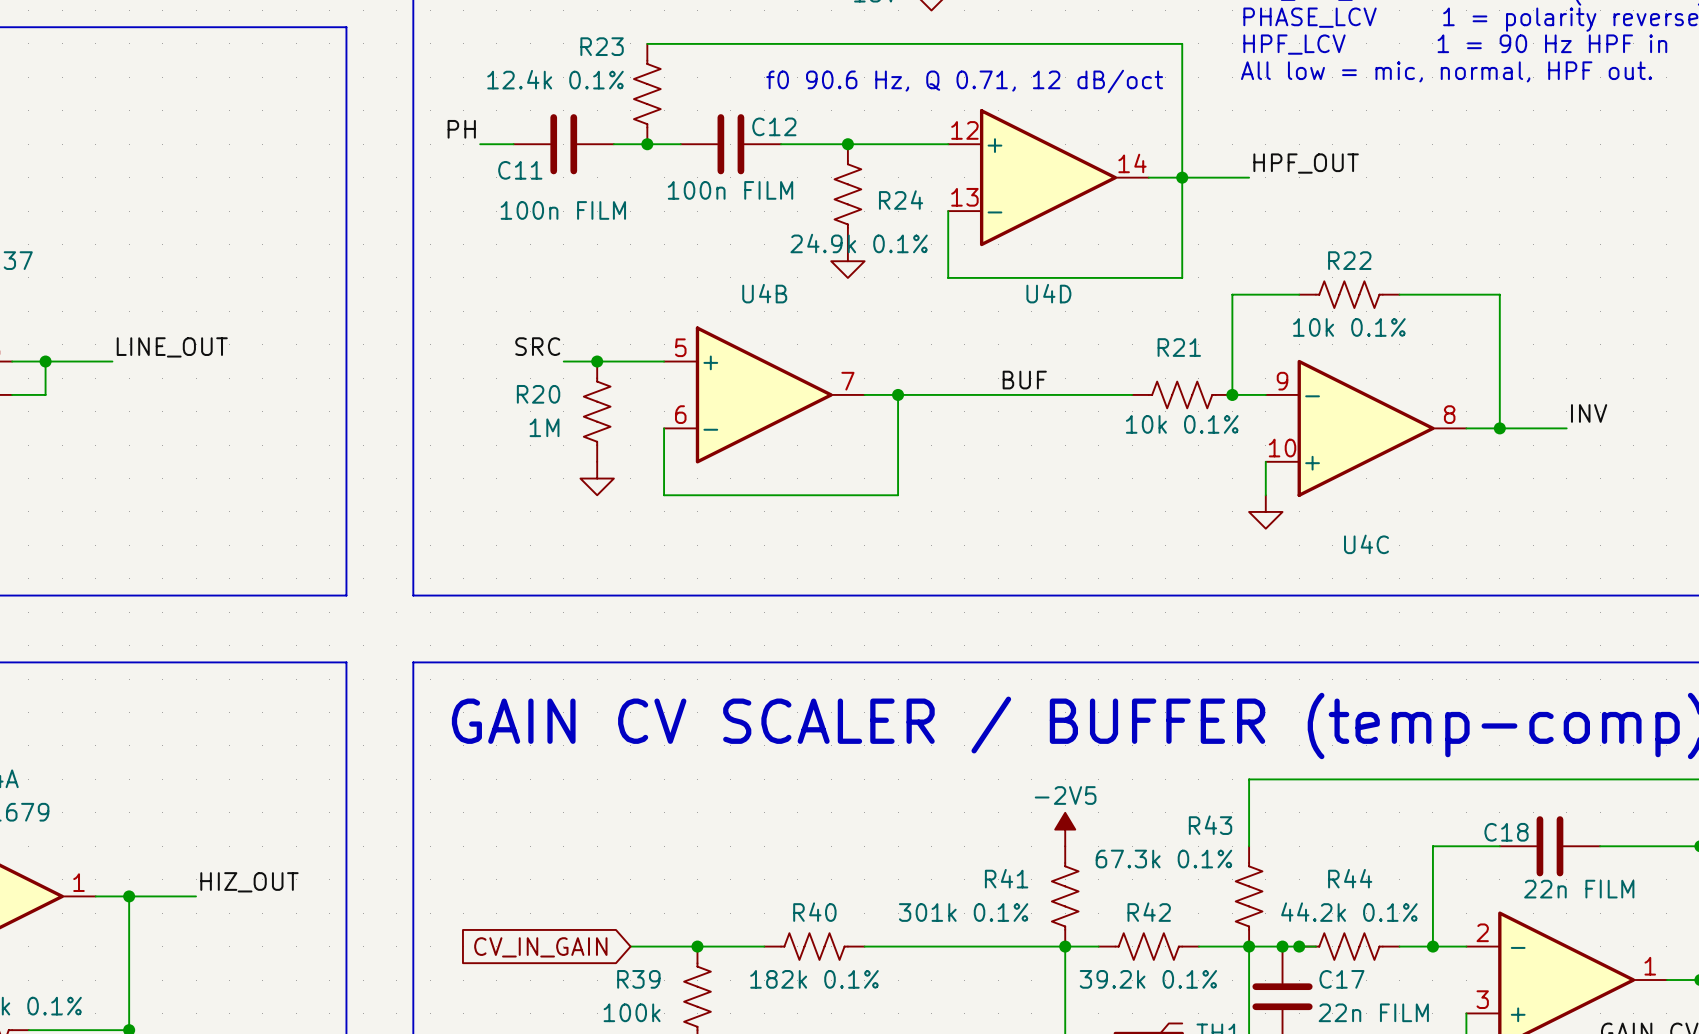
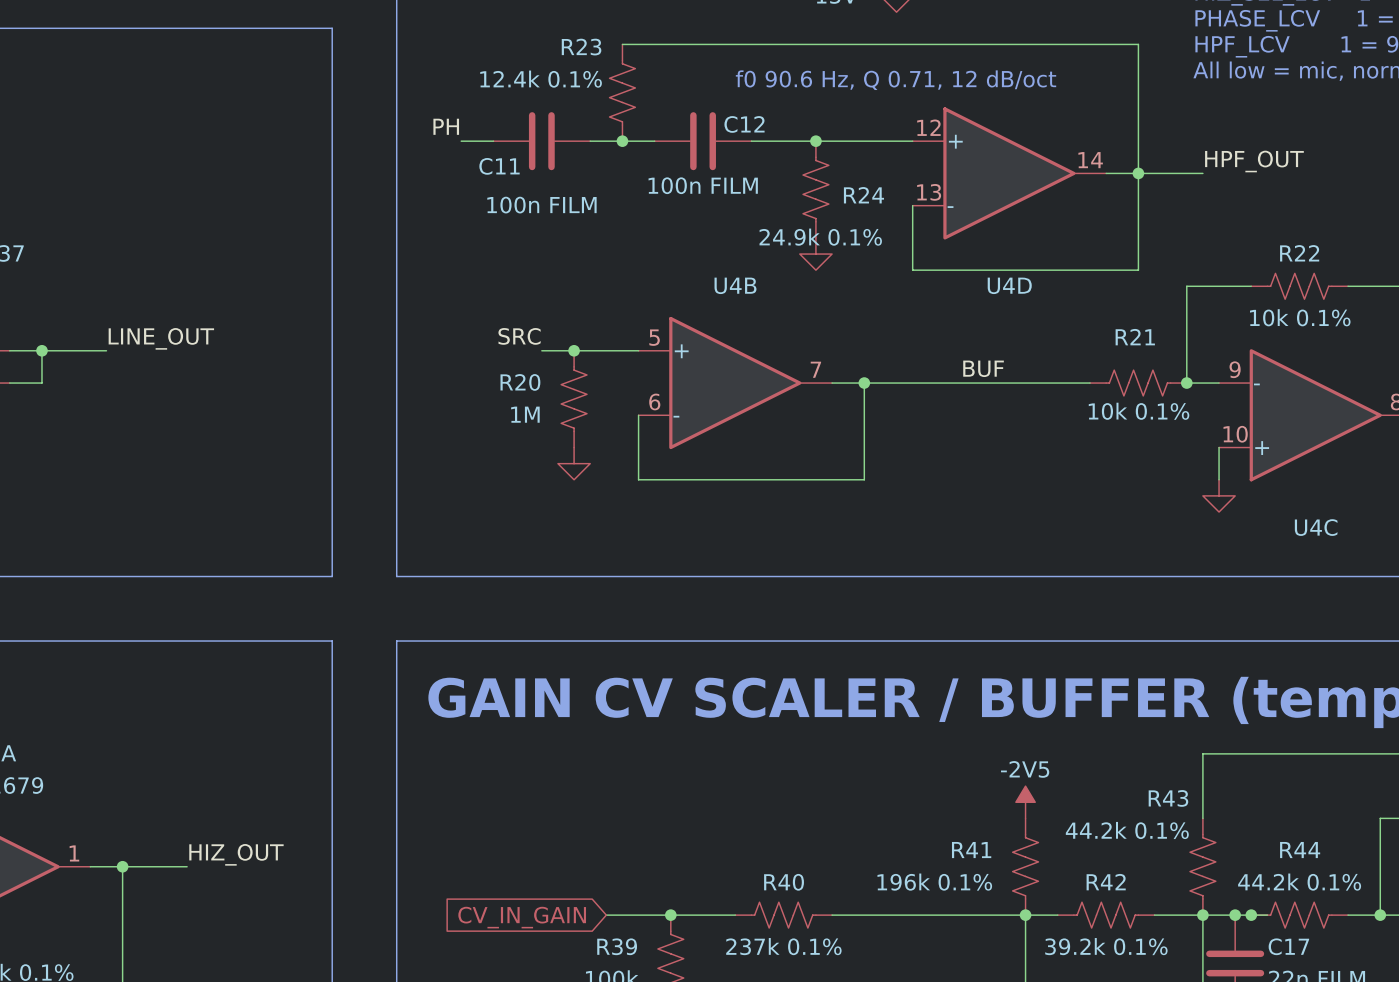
R43 value: 67.3k 0.1% (1163, 859) -> 44.2k 0.1% (1127, 830)
R41 value: 301k 0.1% (963, 912) -> 196k 0.1% (934, 882)
R40 value: 182k 0.1% (814, 979) -> 237k 0.1% (783, 946)

